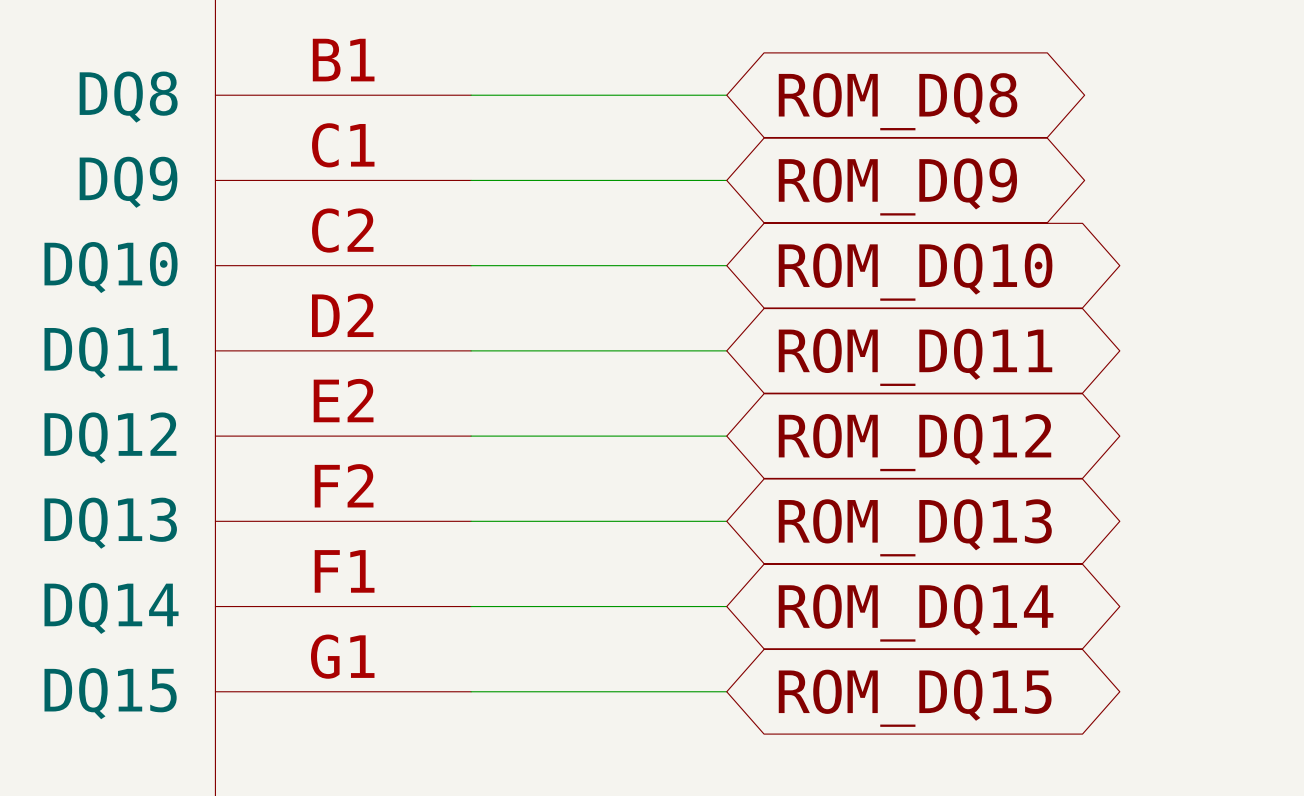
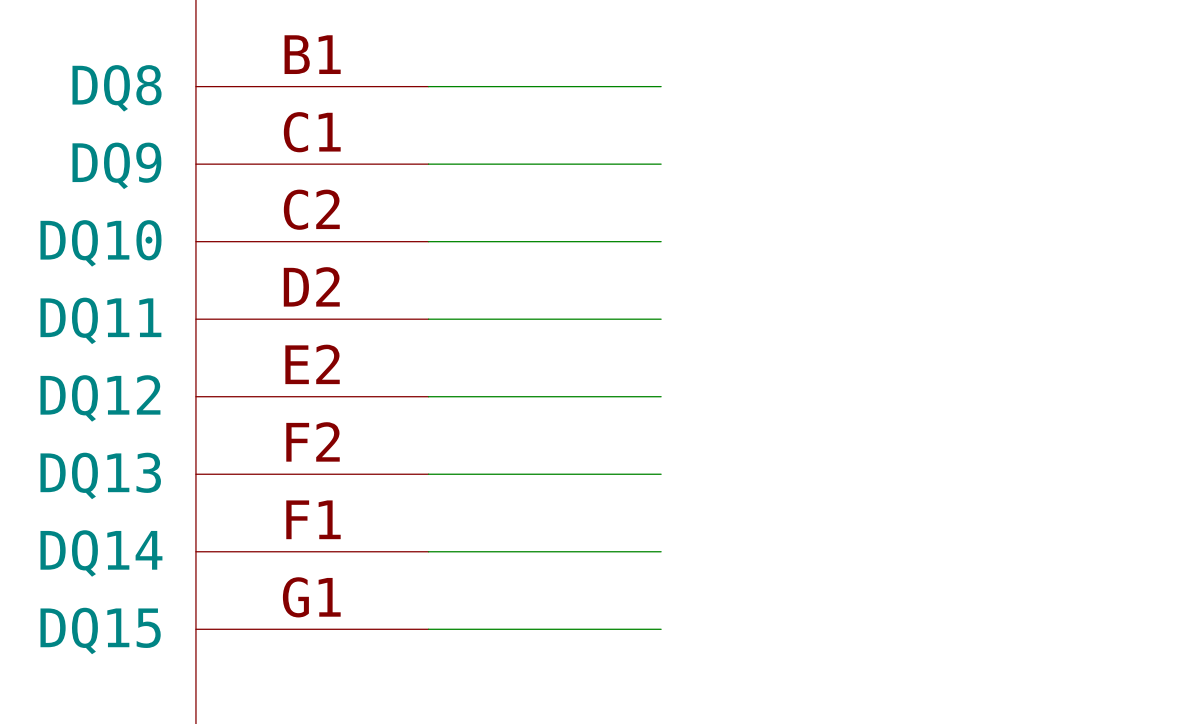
global label: ROM_DQ8 (898, 101) -> none
global label: ROM_DQ9 (897, 186) -> none
global label: ROM_DQ10 (915, 272) -> none
global label: ROM_DQ11 (915, 357) -> none
global label: ROM_DQ12 (915, 442) -> none
global label: ROM_DQ13 (915, 527) -> none
global label: ROM_DQ14 (916, 613) -> none
global label: ROM_DQ15 (915, 698) -> none

